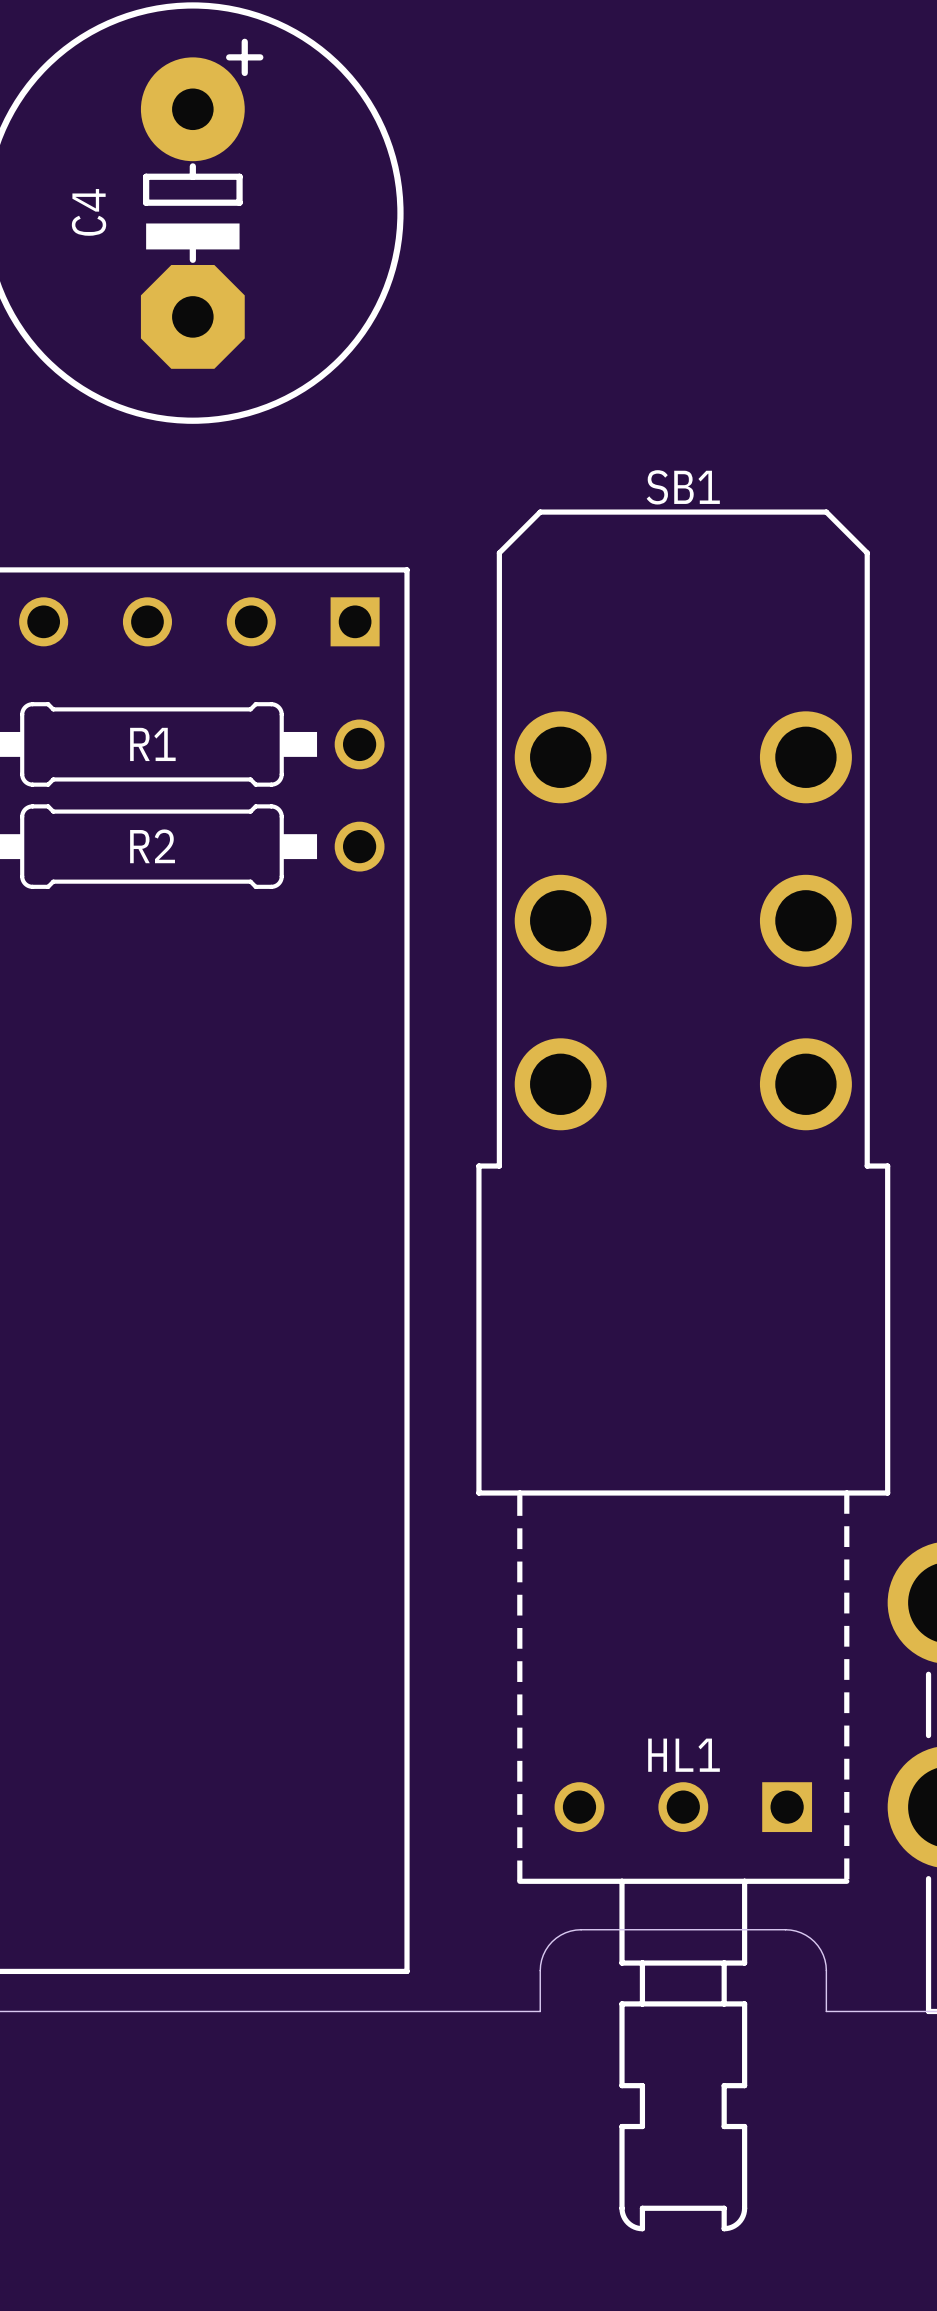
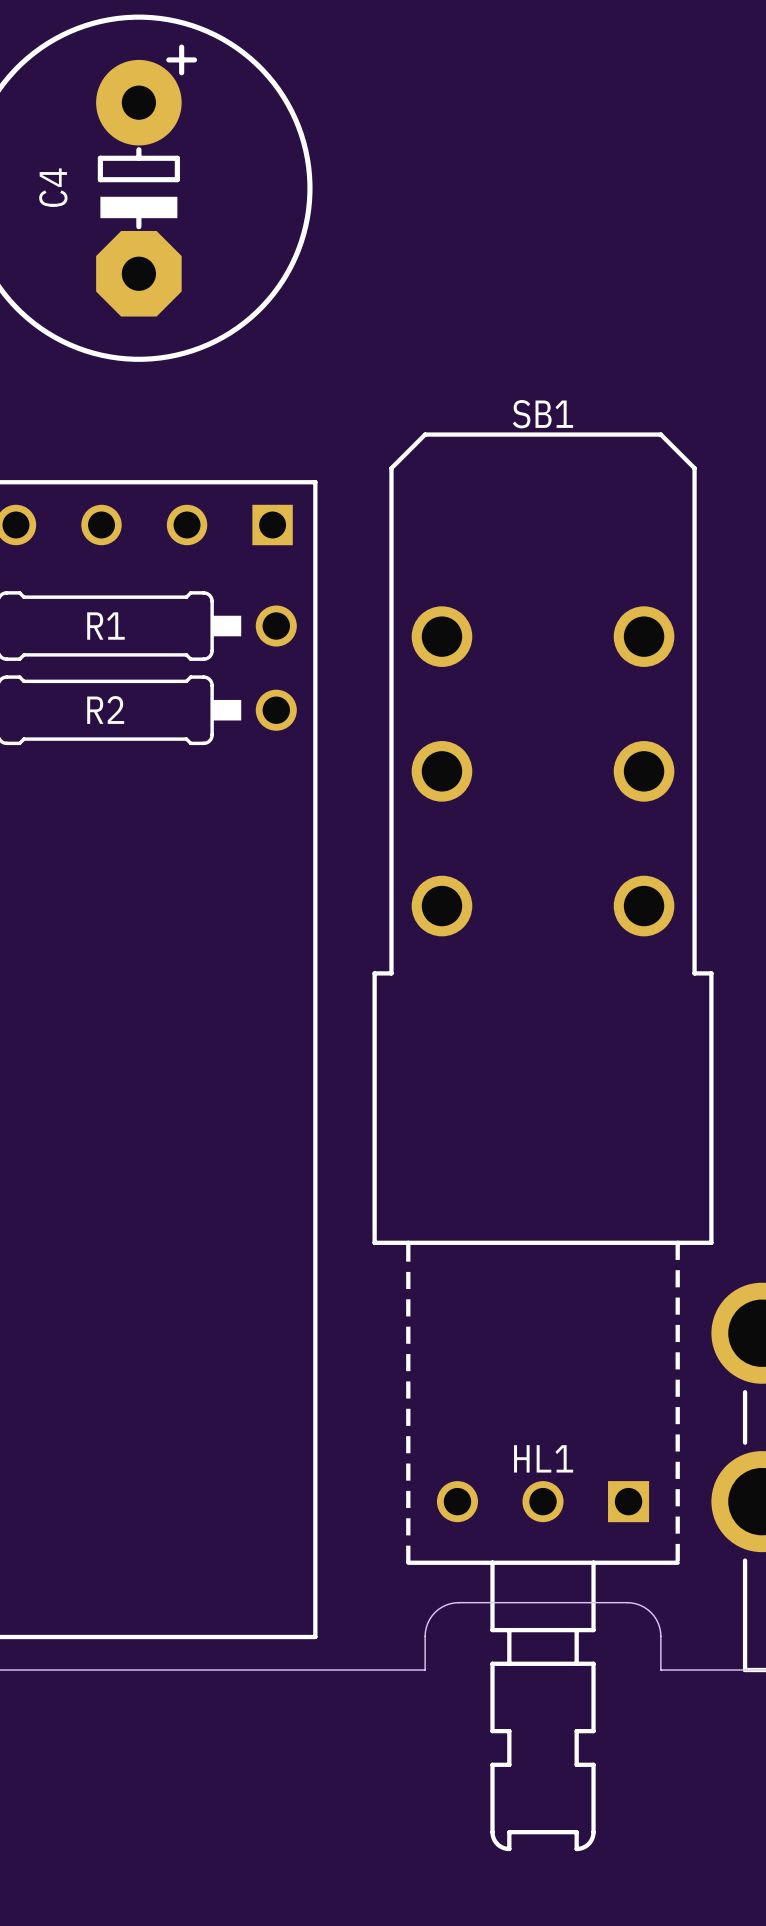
SB1 footprint: [476, 509, 891, 2232] -> [372, 432, 714, 1852]

